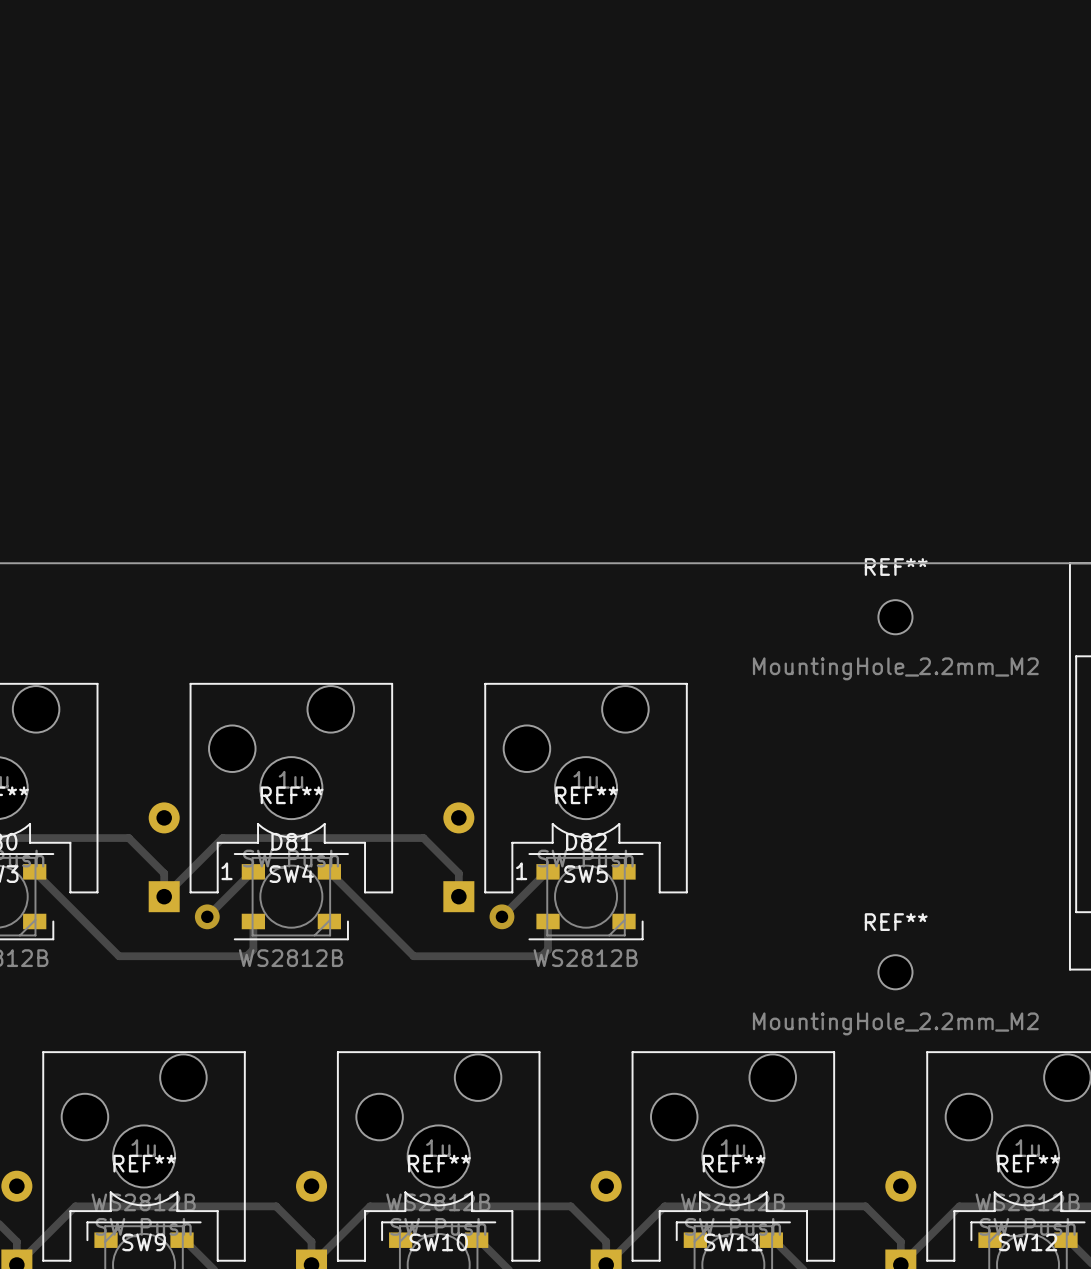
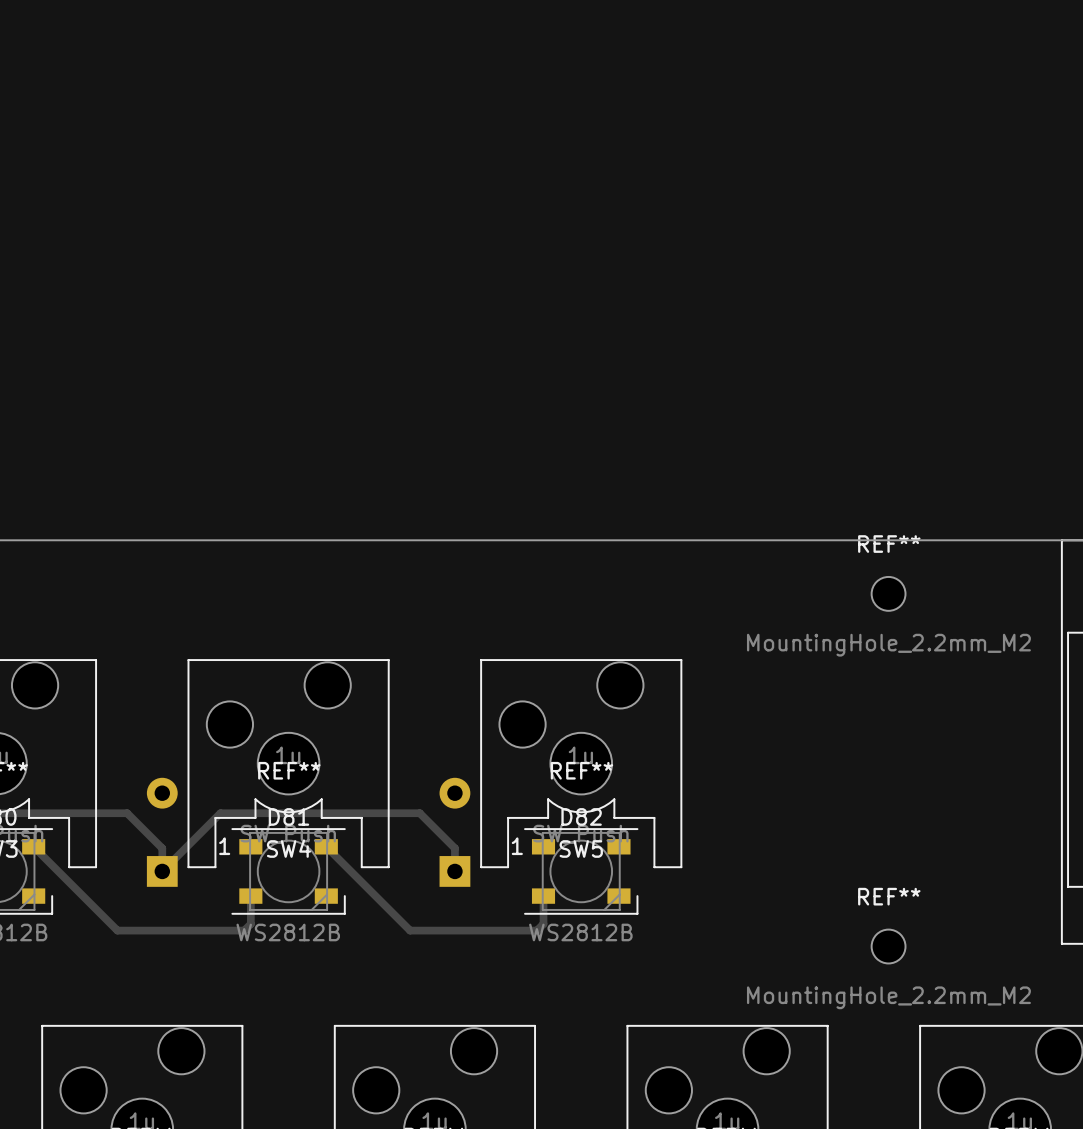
track: (252, 871) (207, 916) -> none
track: (548, 871) (501, 916) -> none
via: (207, 916) -> none
via: (501, 916) -> none

